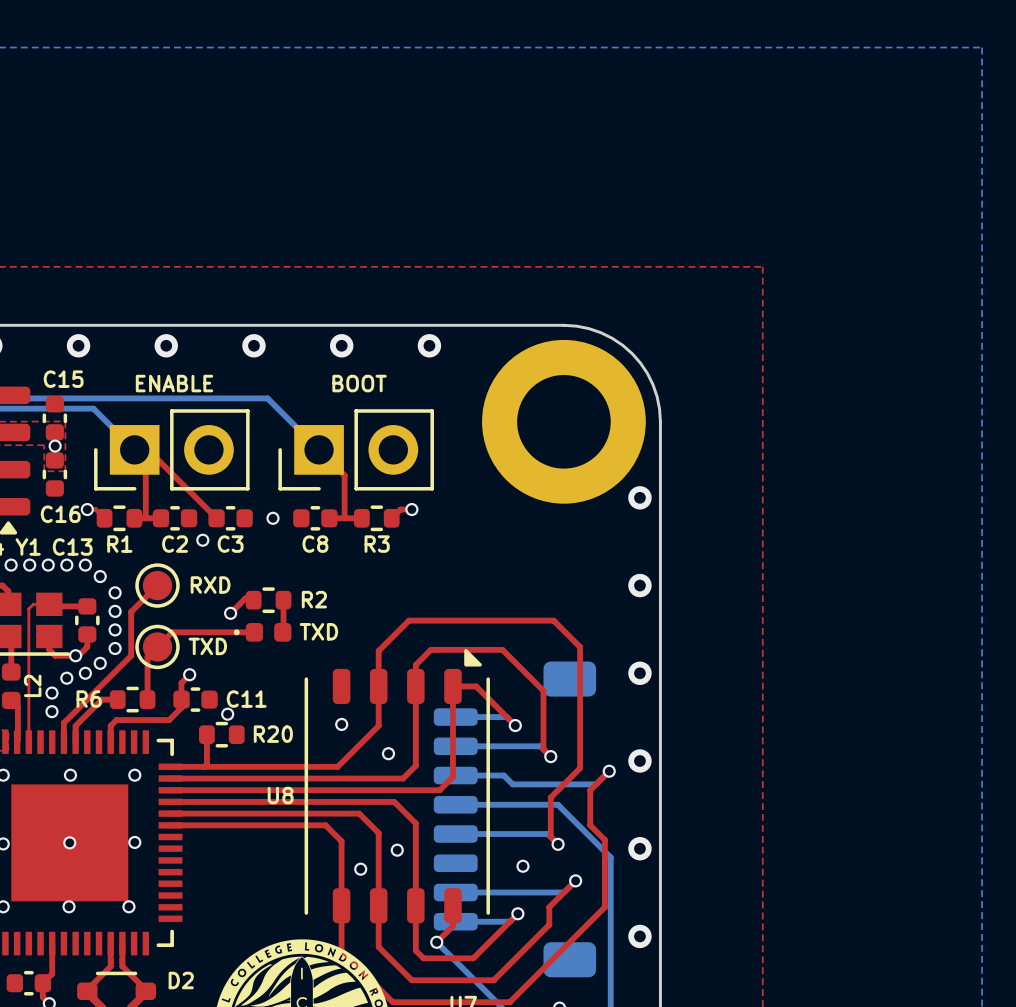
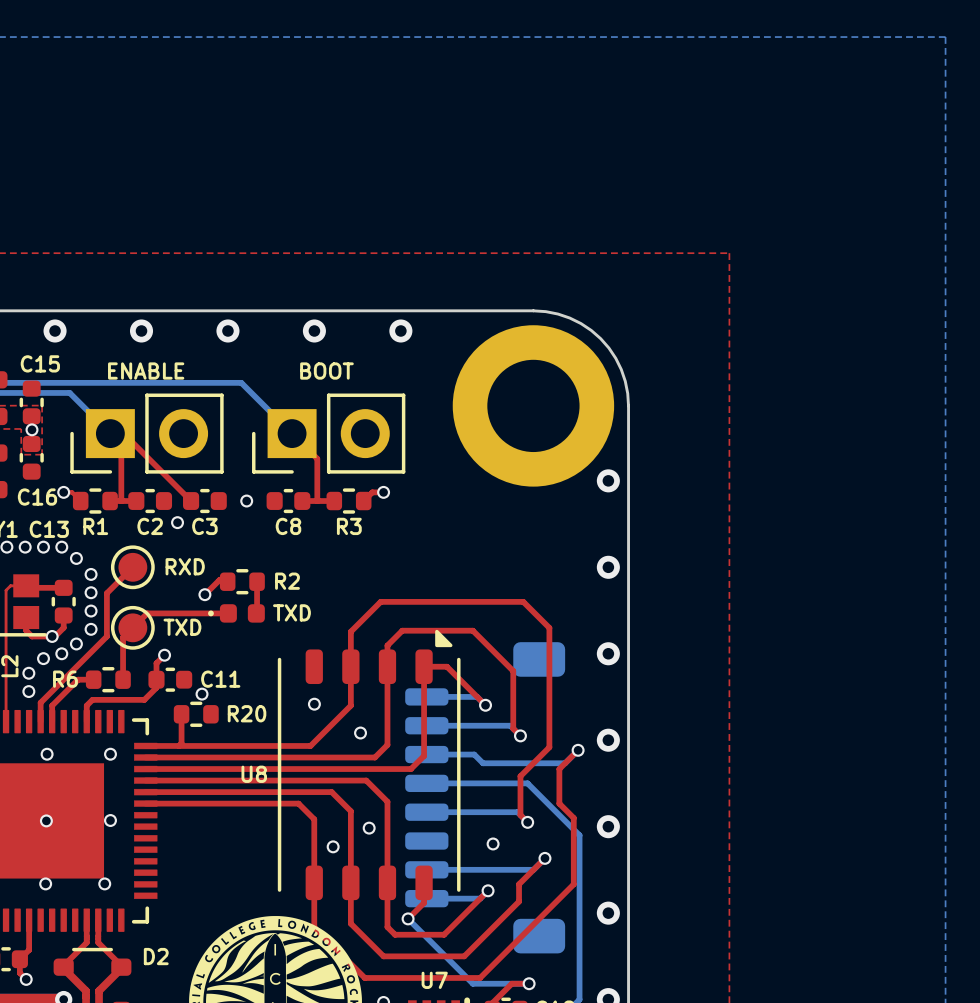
ENABLE name: ENABLE (174, 383) -> none
BOOT name: BOOT (359, 383) -> none
text: none -> ENABLE (146, 371)
text: none -> BOOT (326, 371)

